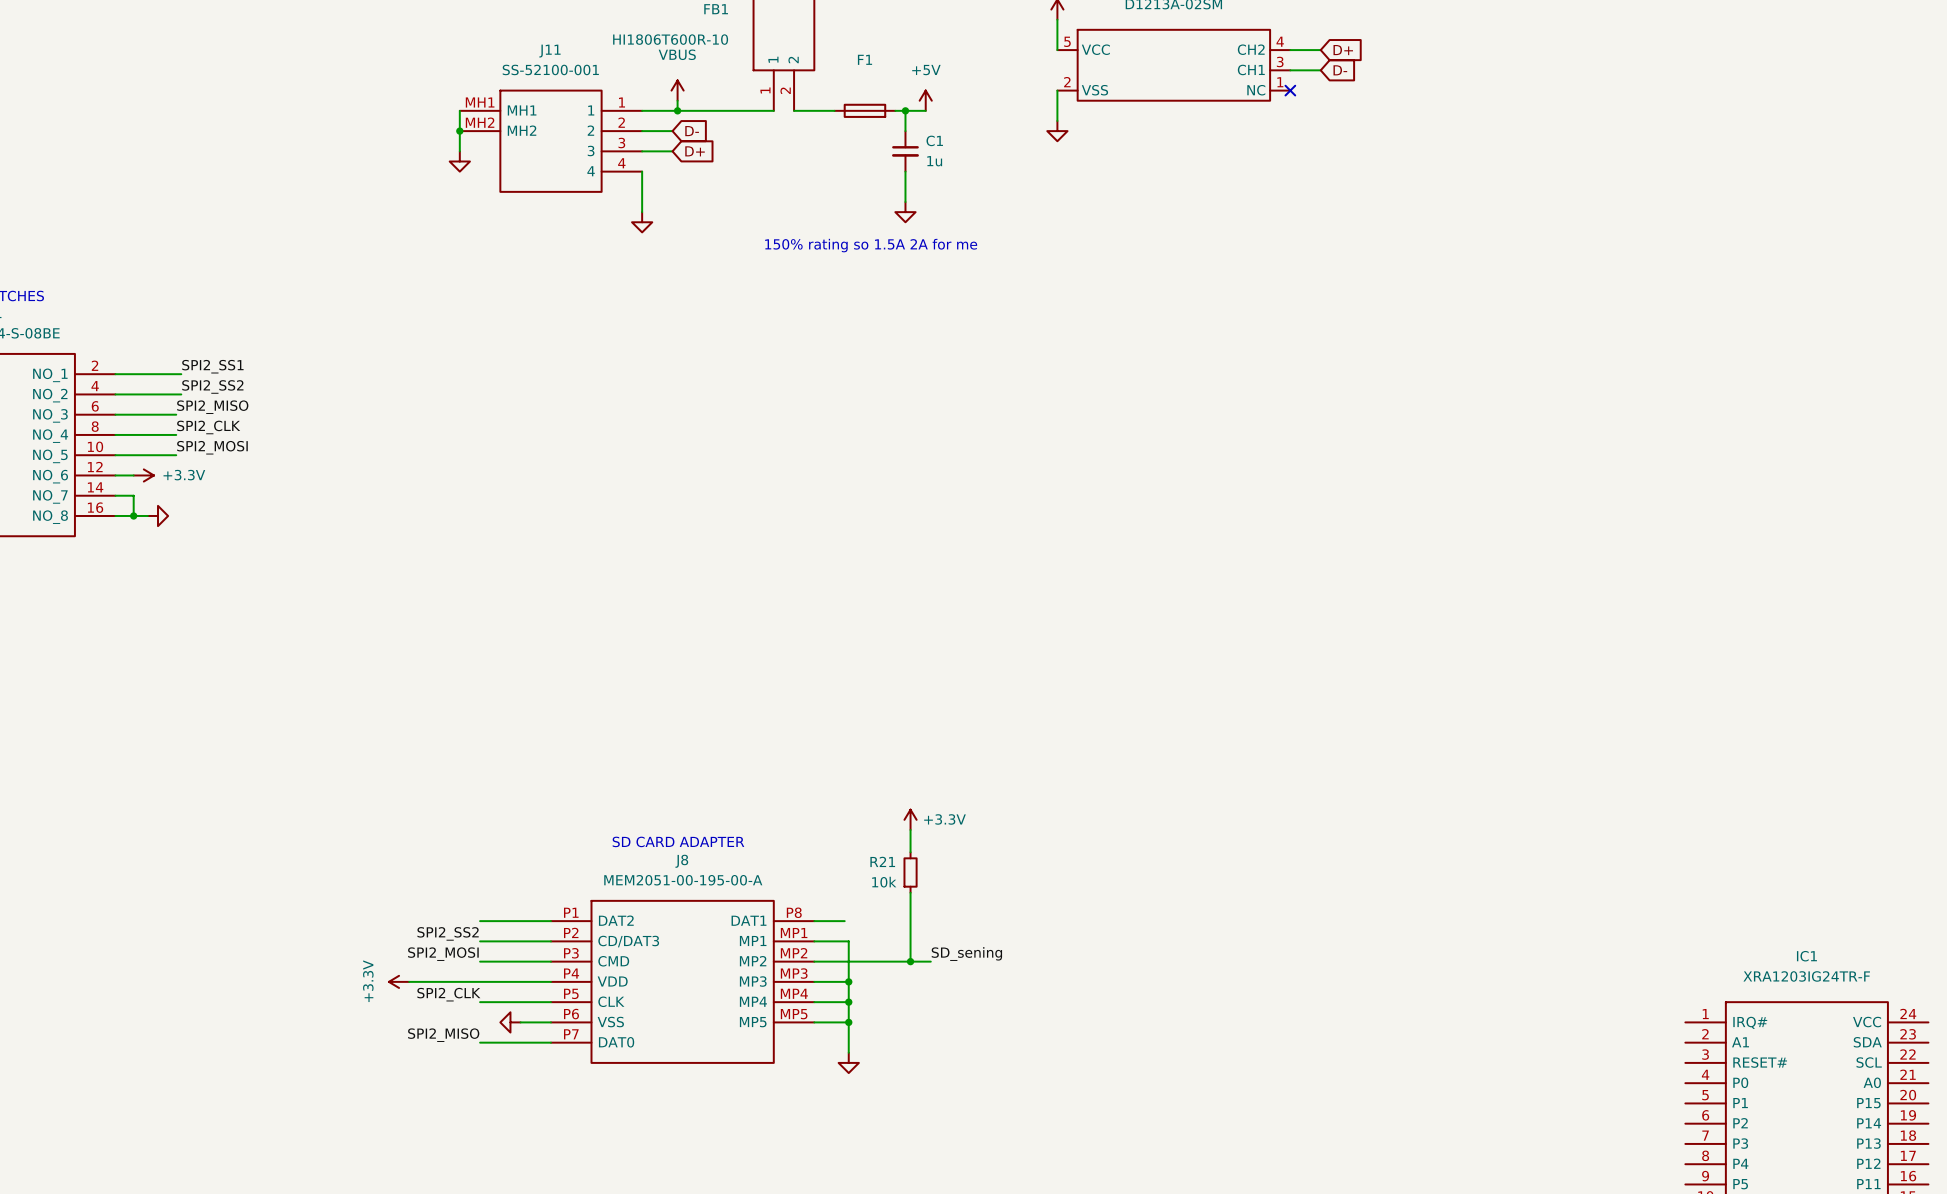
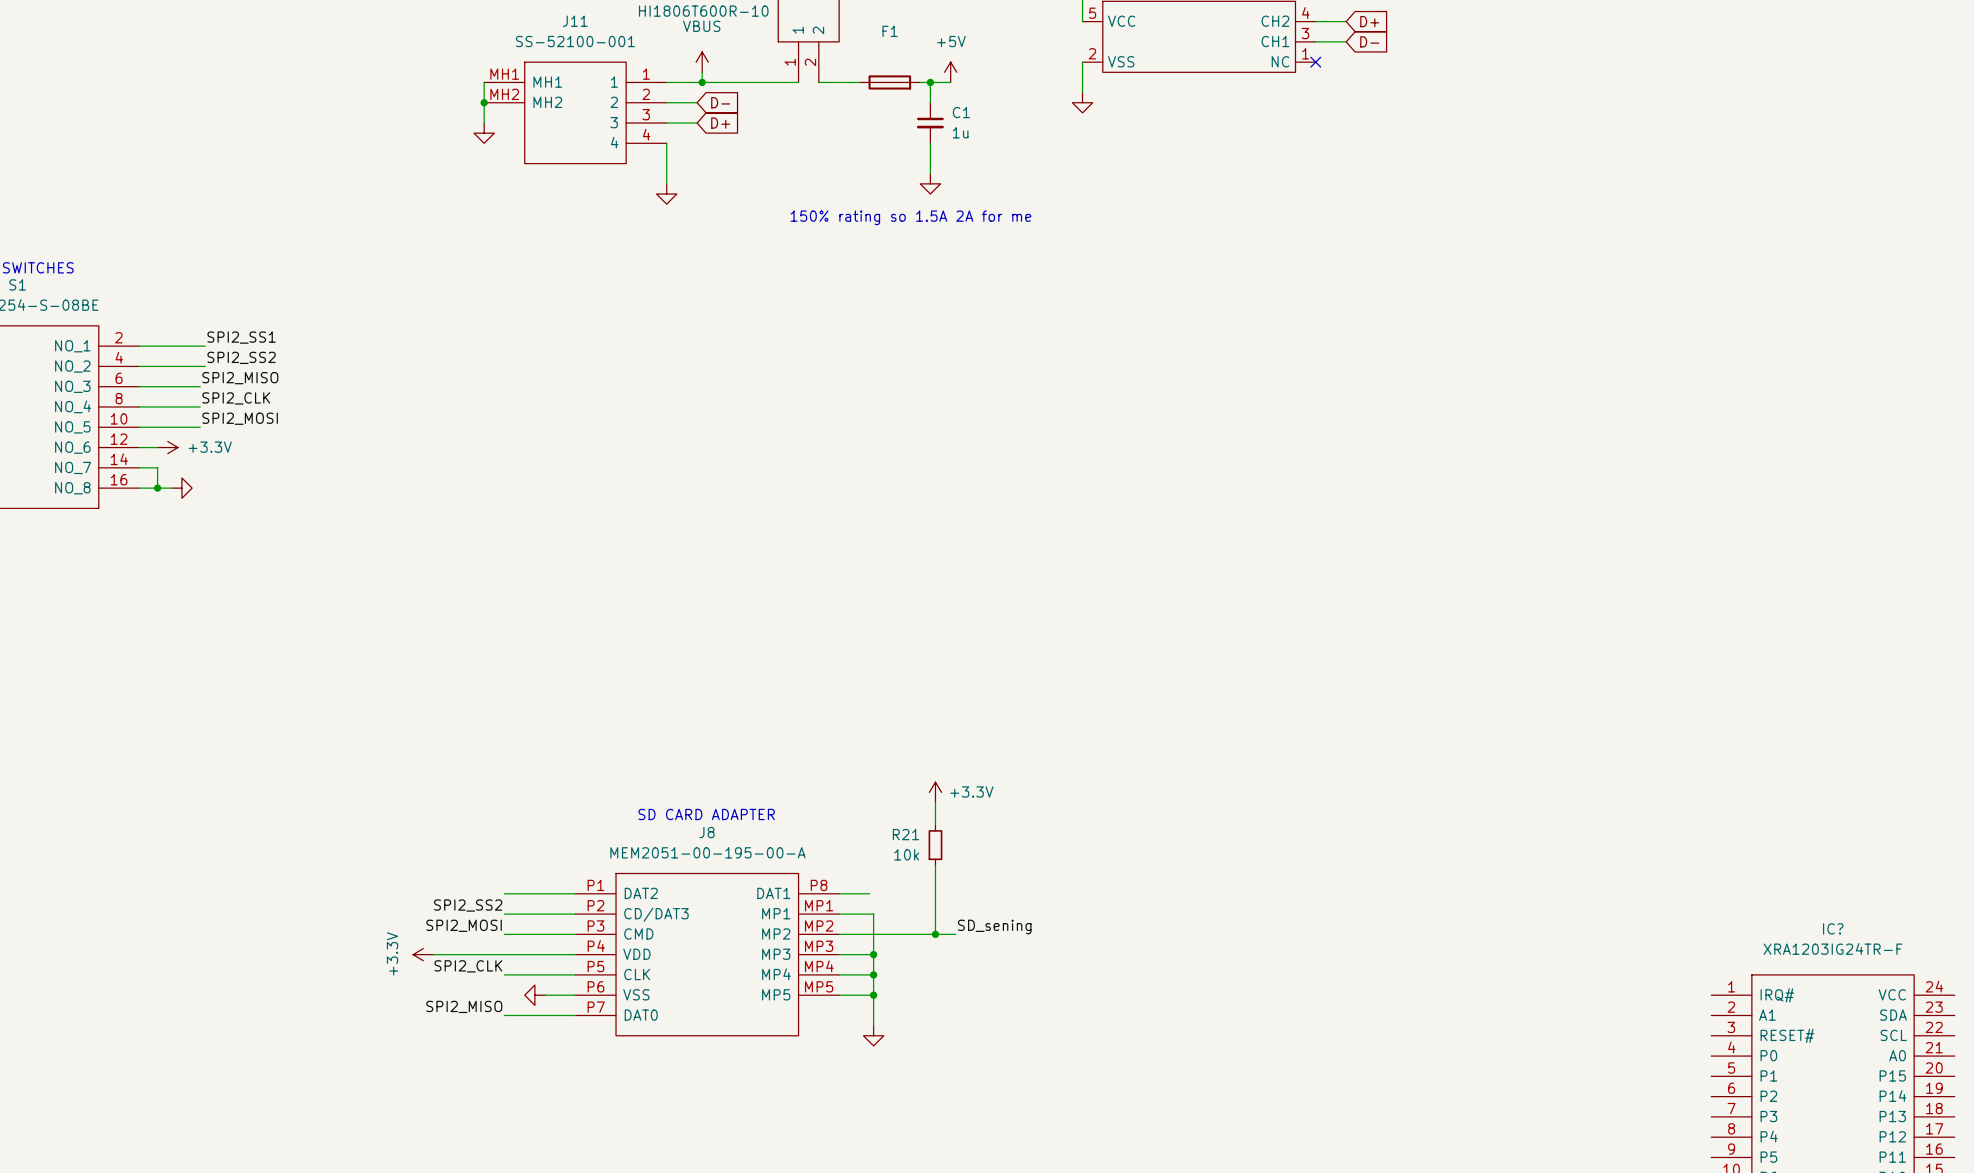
IC1 name: IC1 (1806, 956) -> IC? (1833, 928)

